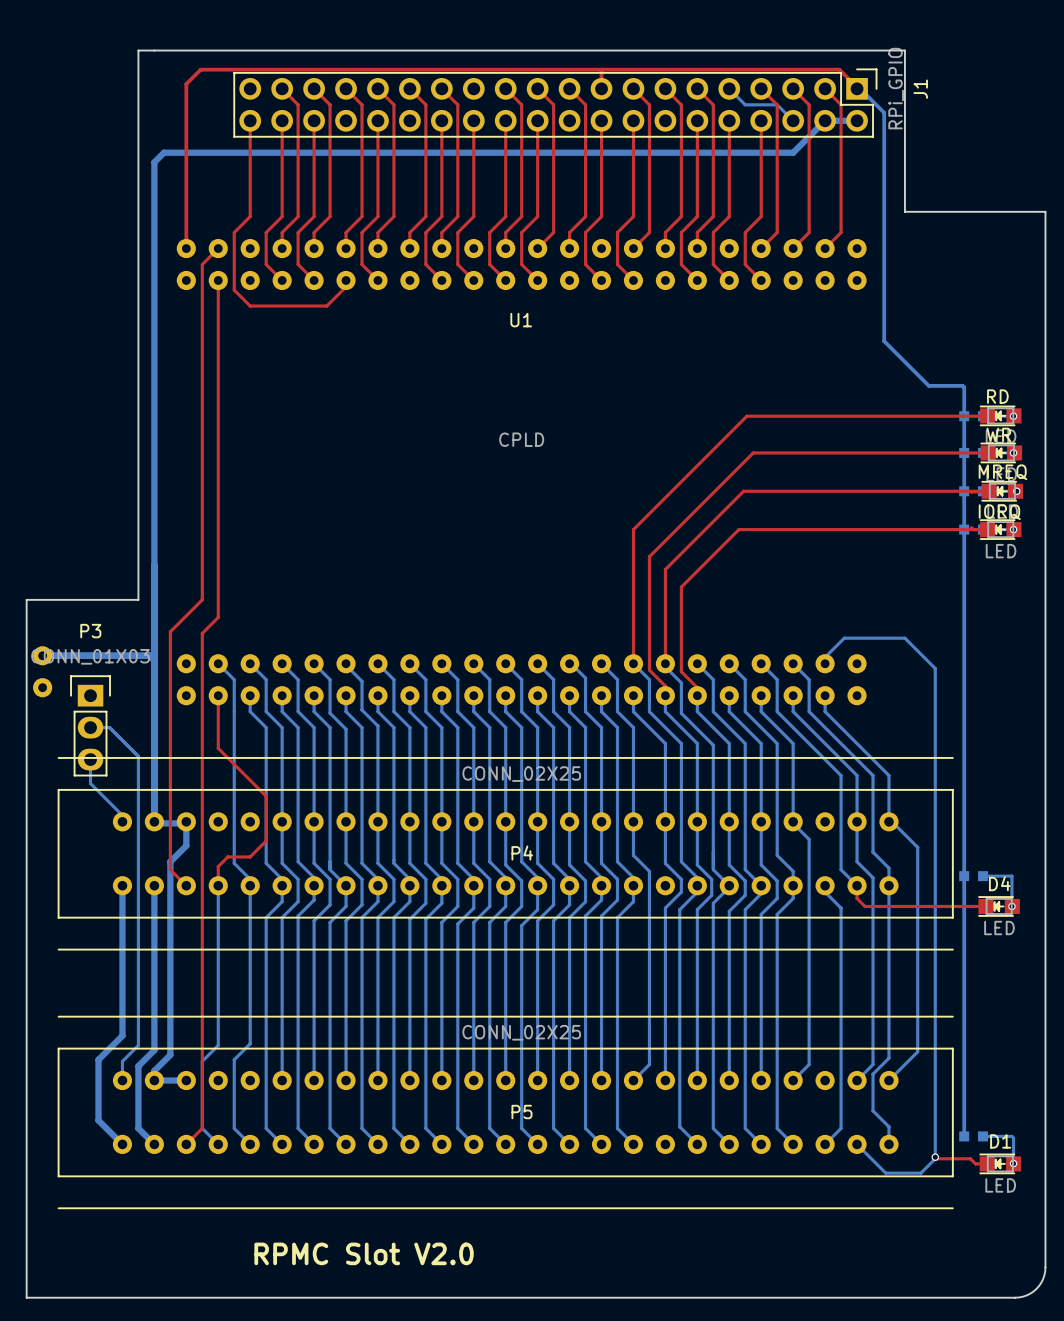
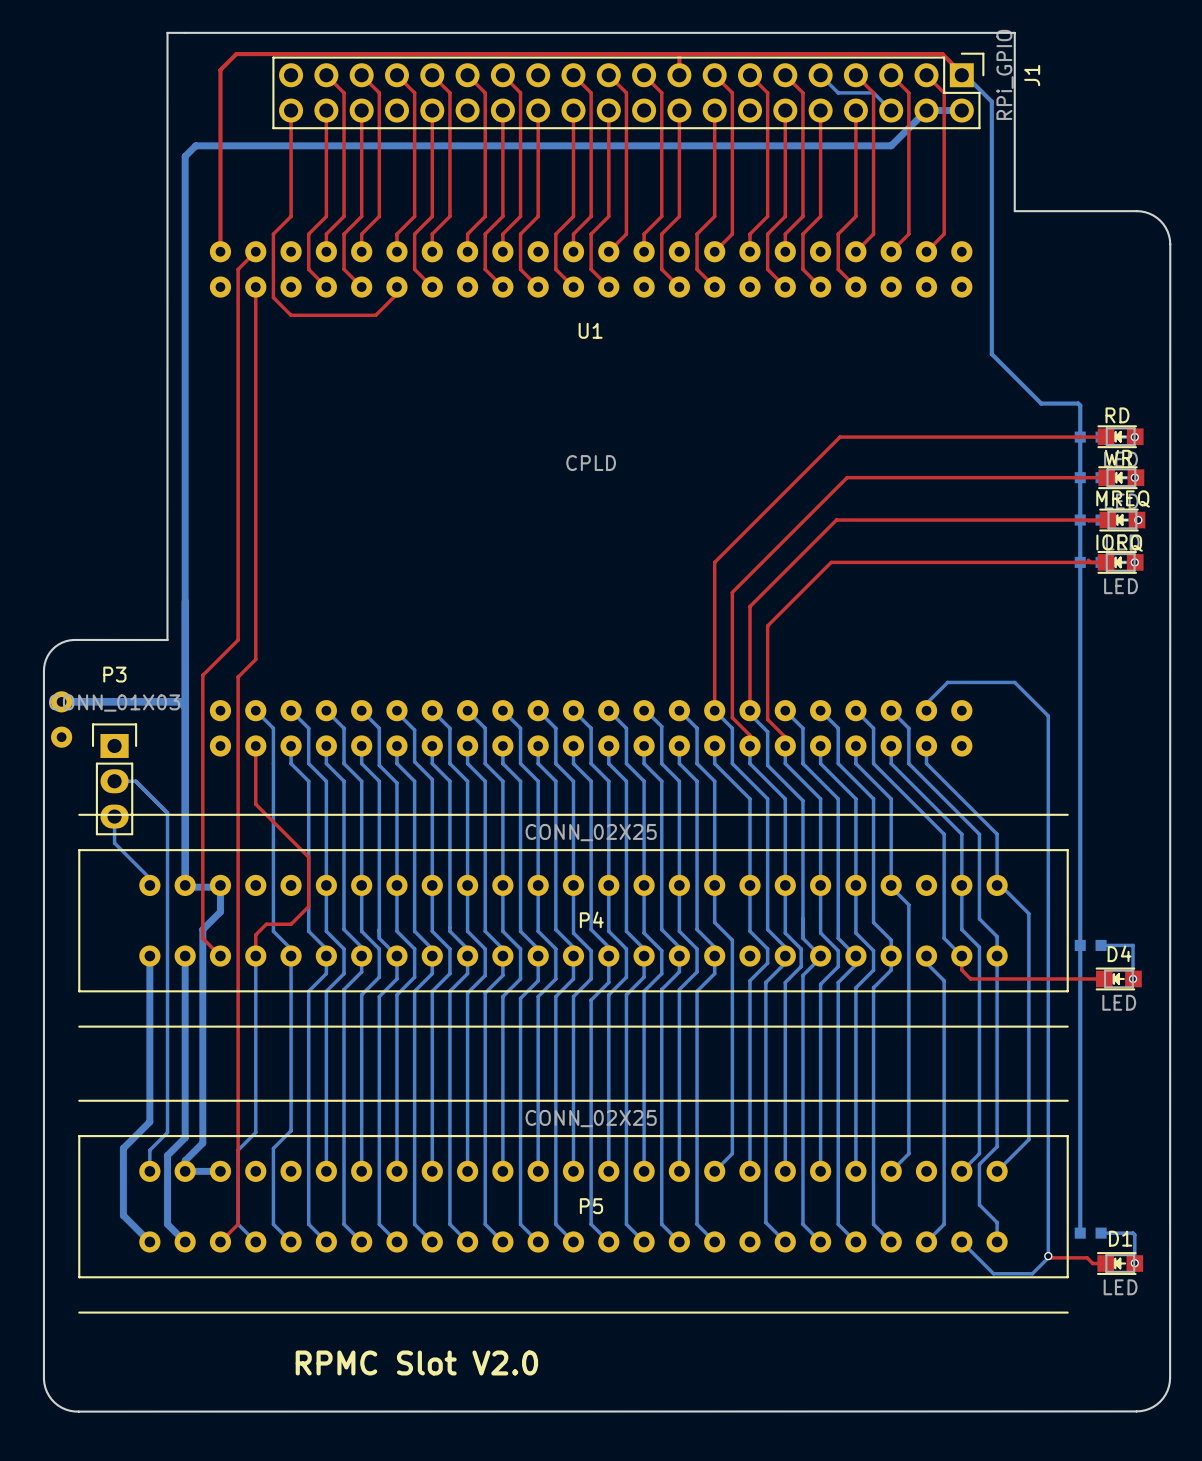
board edge: (1015, 211) (1045, 211) (1045, 1267) -> (1136, 211) (1149, 213) (1160, 220) (1167, 231) (1170, 244) (1170, 1377)
board edge: (138, 599) (26, 599) (26, 628) -> (167, 640) (65, 641) (55, 646) (49, 652) (46, 659) (43, 671)
board edge: (26, 1268) (26, 1297) (1015, 1297) -> (43, 1379) (45, 1387) (51, 1399) (61, 1407) (74, 1411) (1136, 1411)

